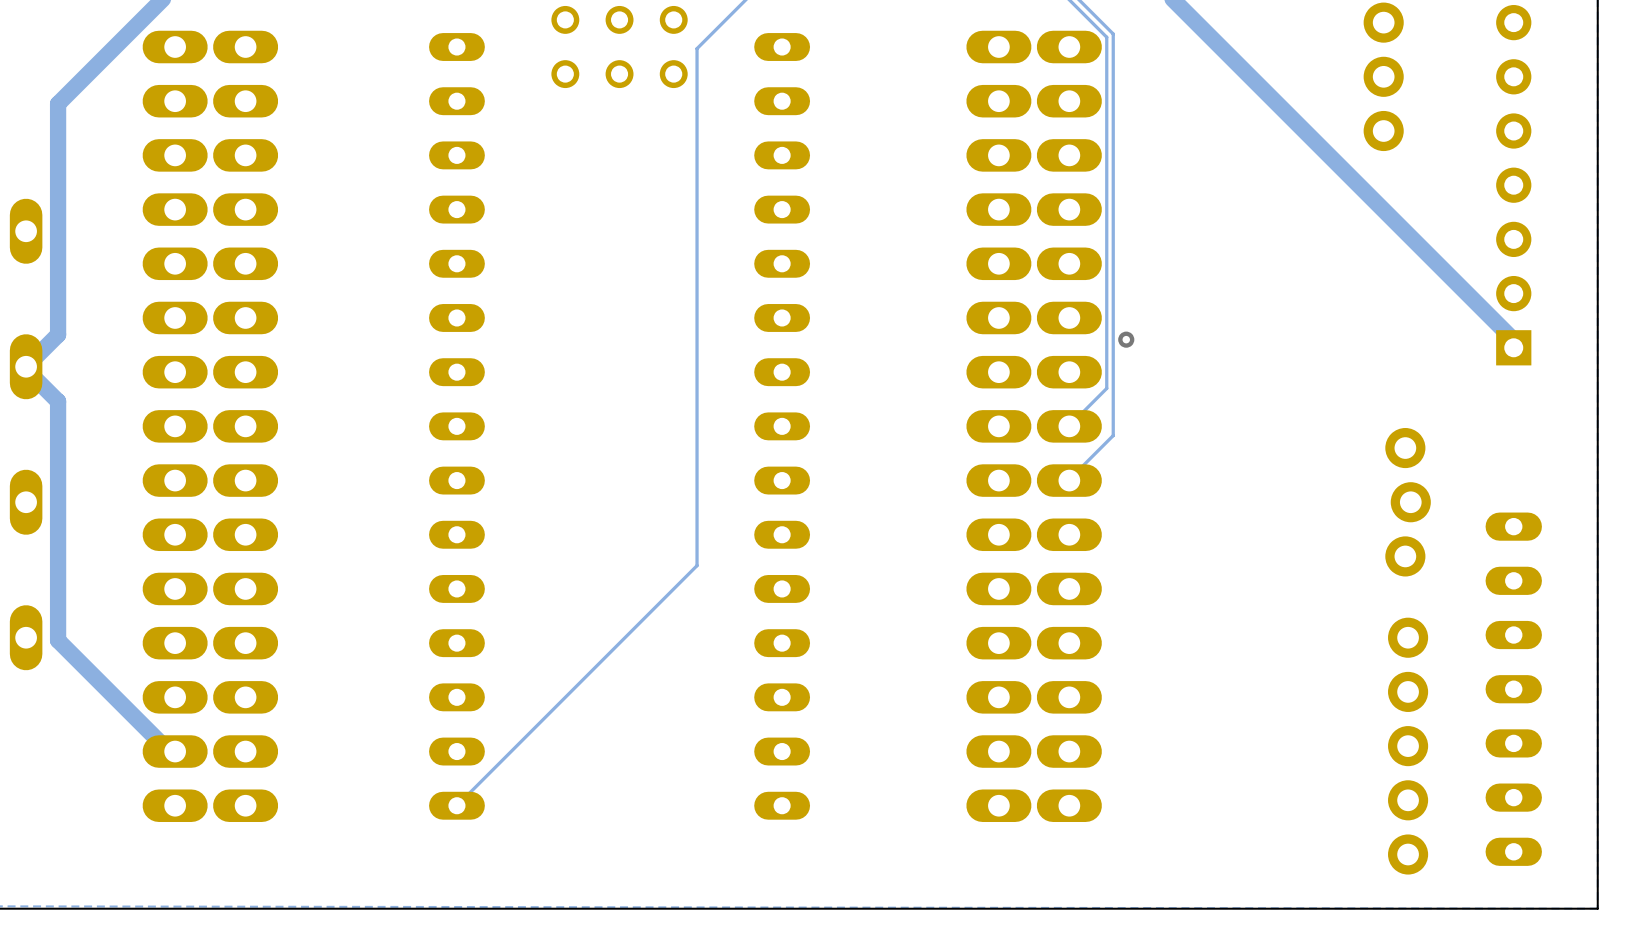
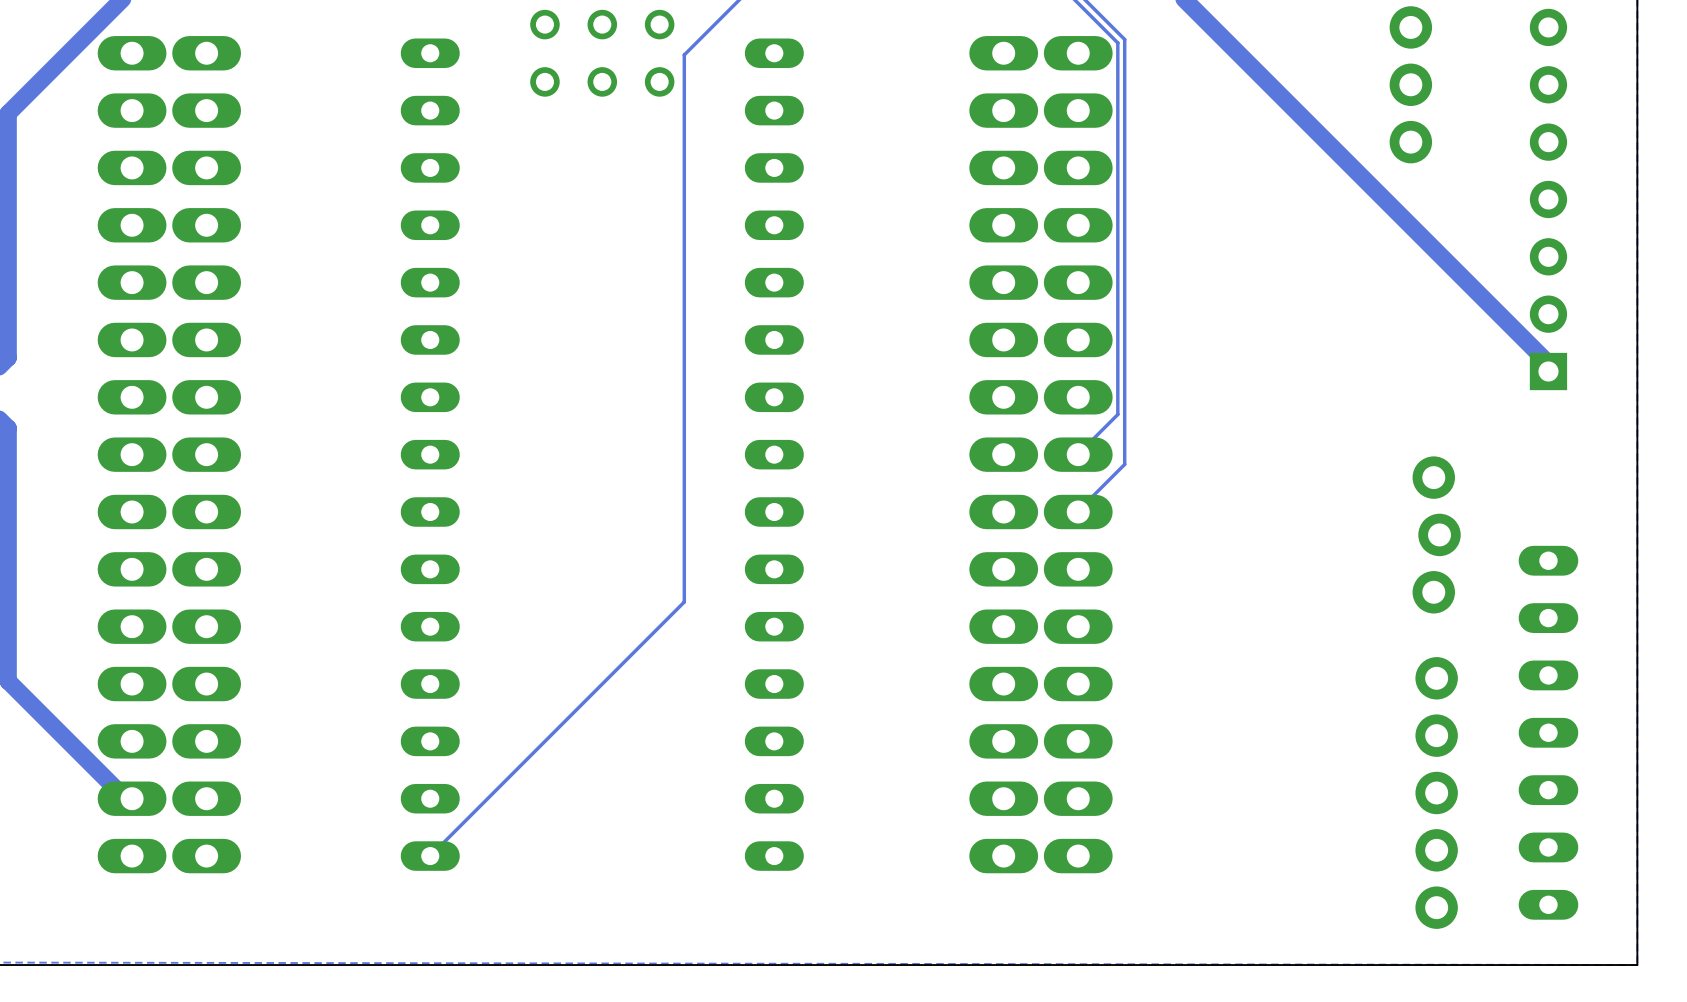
via: (1126, 339) -> none

